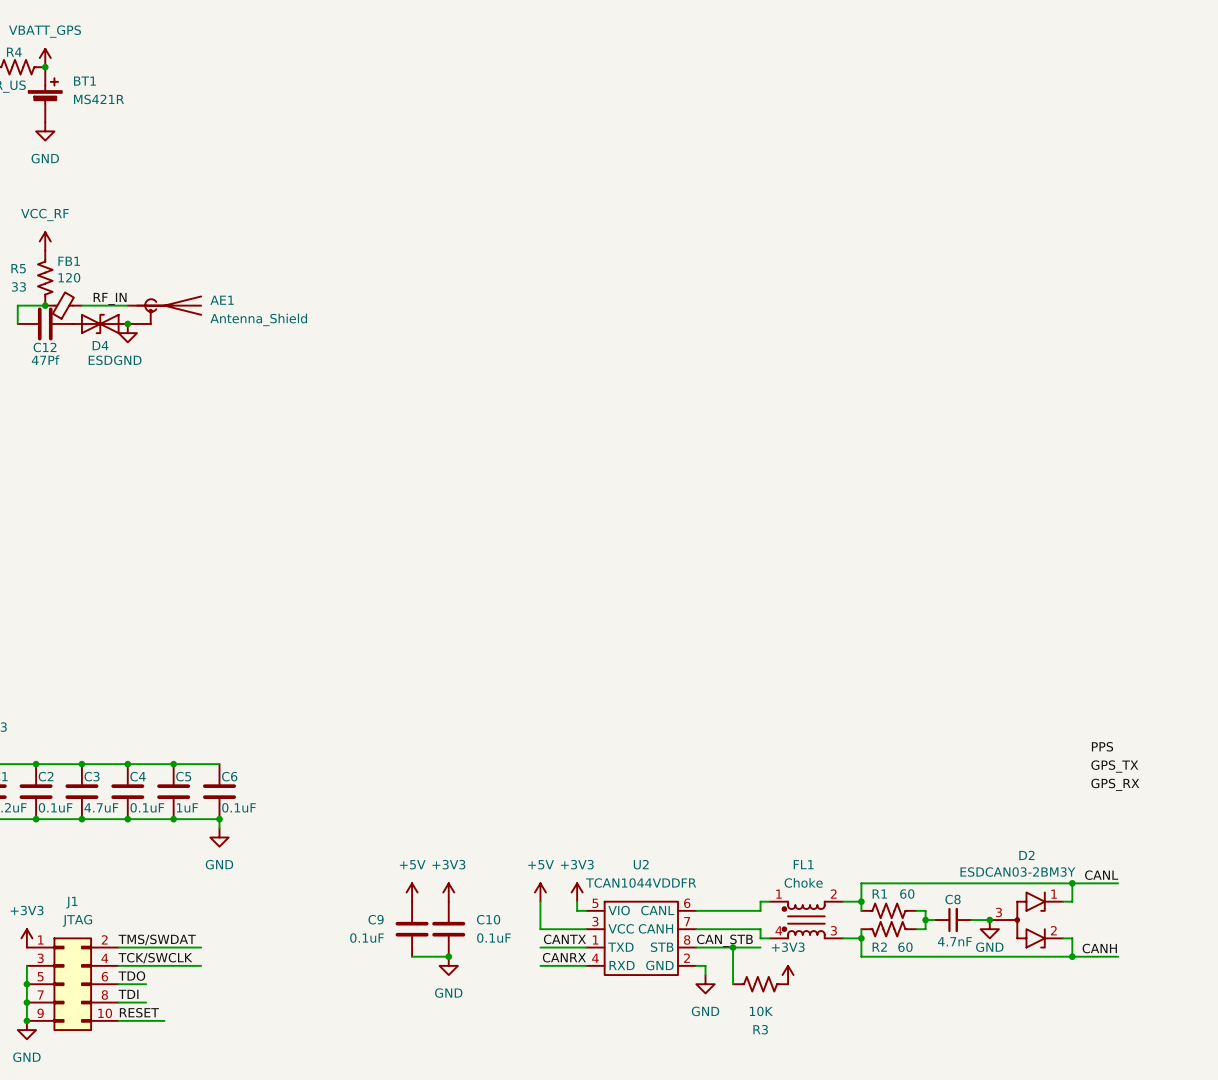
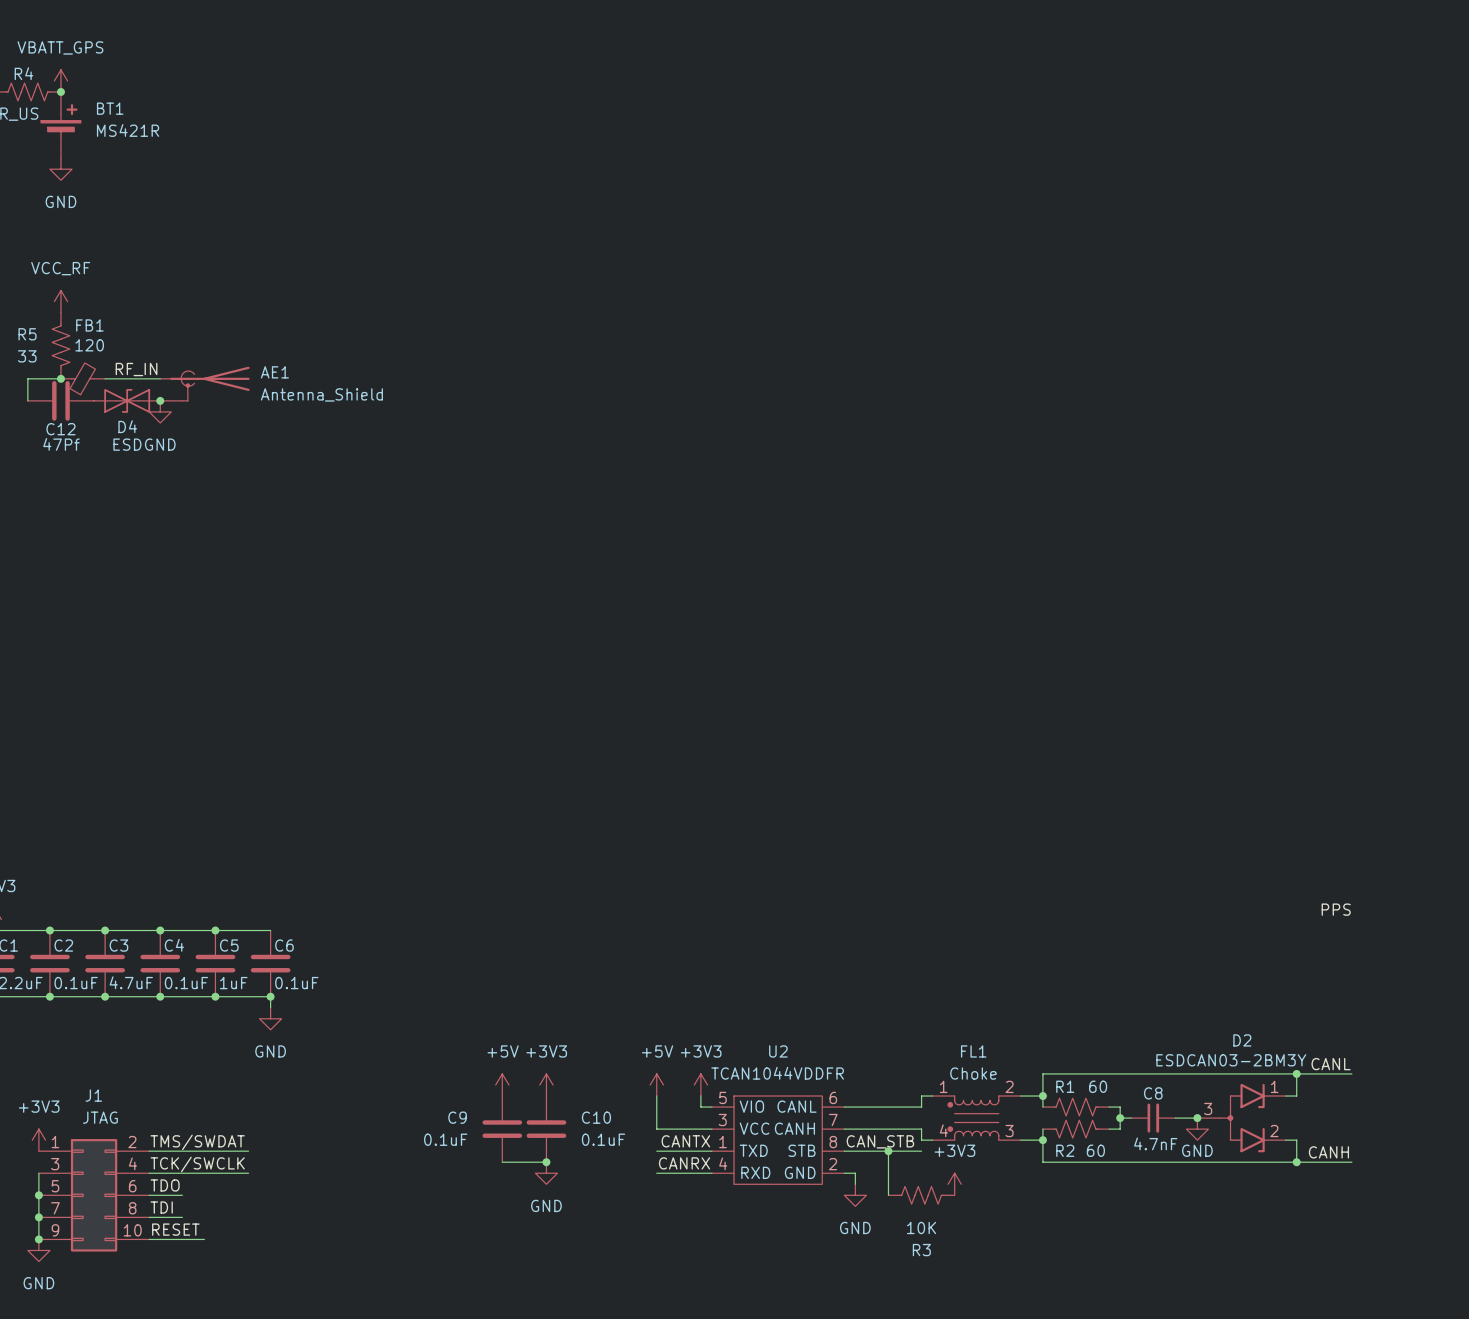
label: GPS_TX (1114, 766) -> none
label: GPS_RX (1115, 784) -> none

